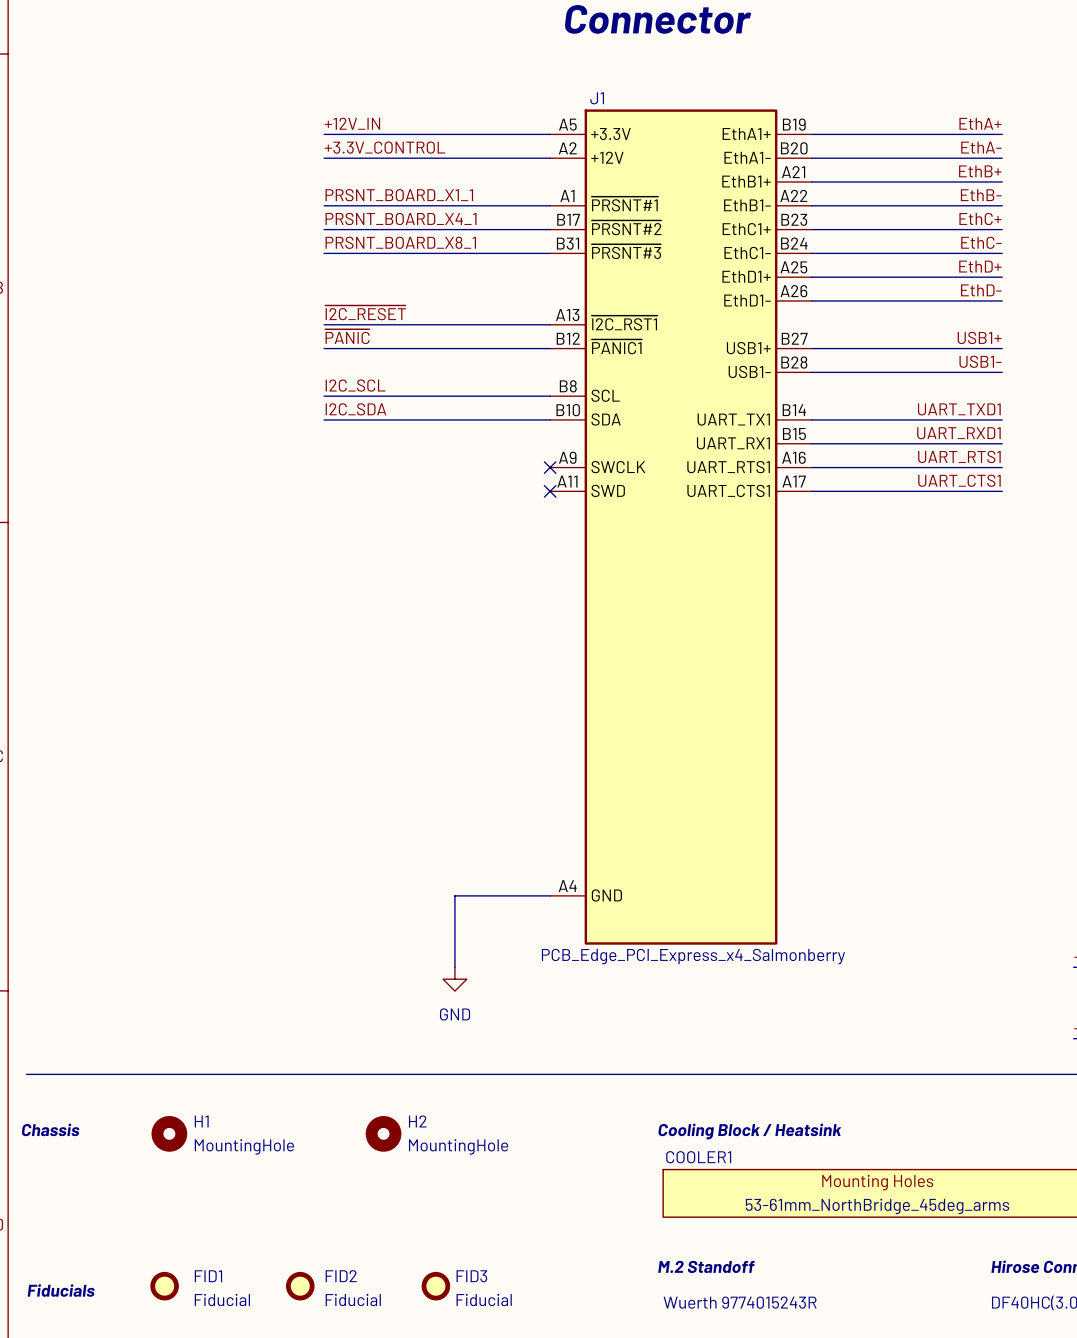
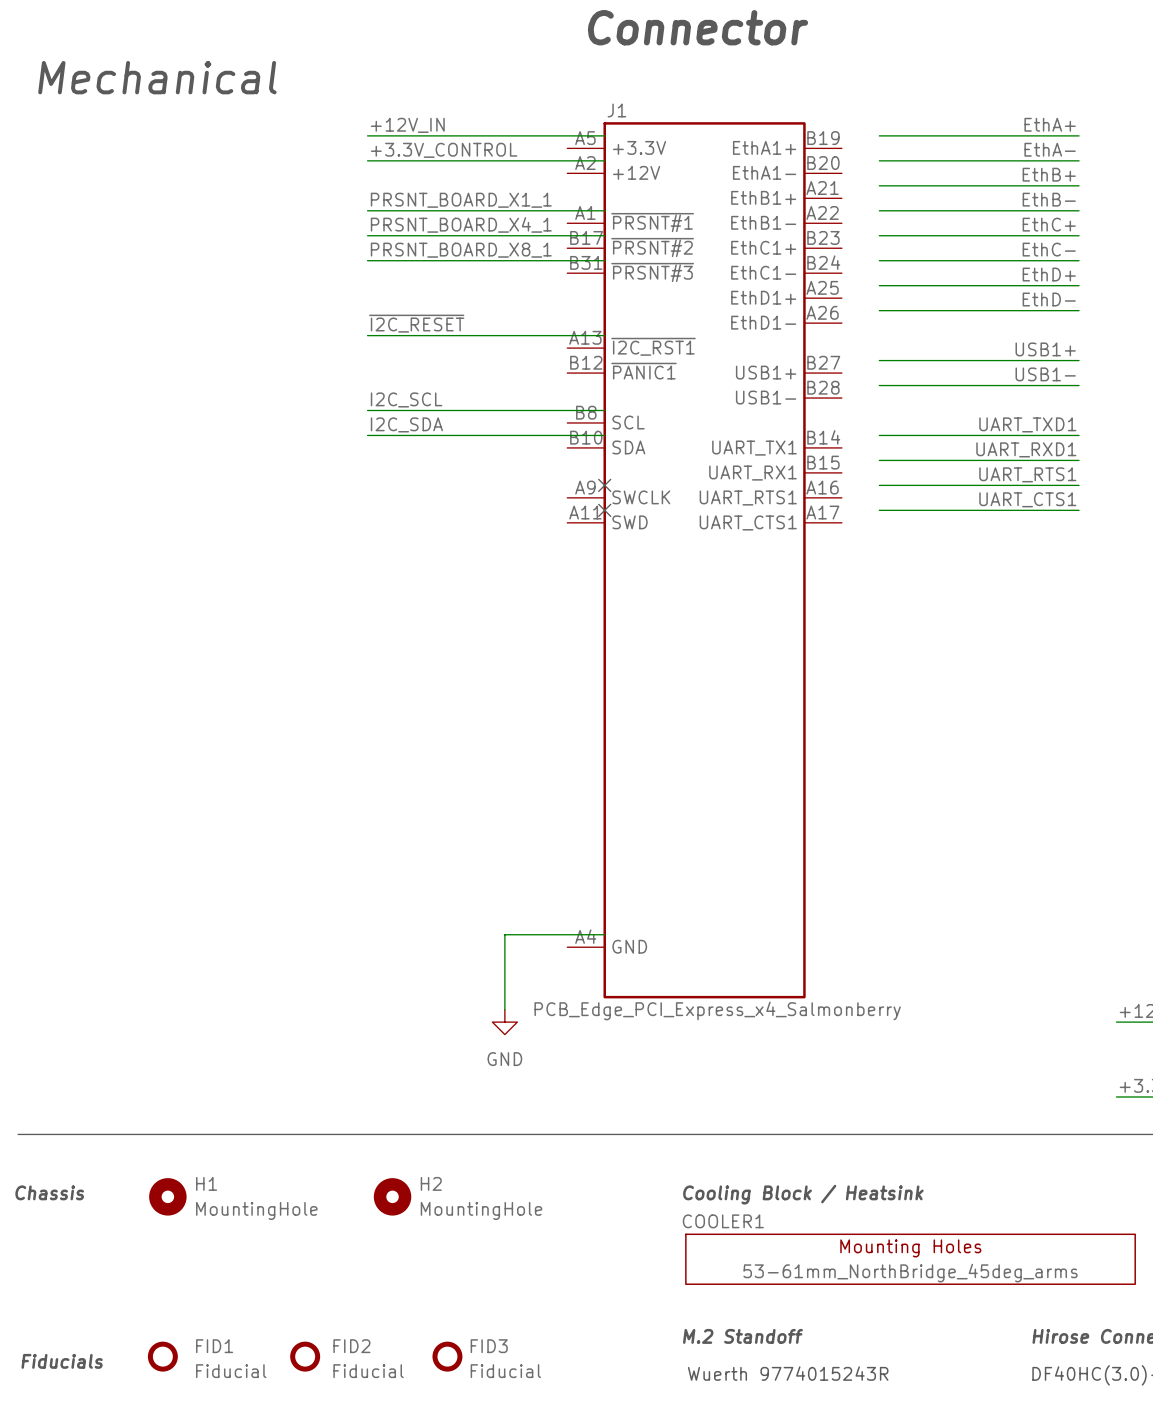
text: none -> Mechanical (157, 77)
label position: +12V_IN (352, 123) -> +12V_IN (407, 125)
label position: EthA+ (980, 123) -> EthA+ (1050, 124)
wire: (324, 134) (550, 134) -> (367, 135) (604, 135)
wire: (811, 134) (1002, 134) -> (879, 135) (1079, 135)
label position: +3.3V_CONTROL (384, 147) -> +3.3V_CONTROL (444, 150)
label position: EthA- (981, 147) -> EthA- (1050, 149)
wire: (324, 158) (550, 158) -> (367, 160) (604, 160)
wire: (811, 158) (1002, 158) -> (879, 160) (1079, 160)
label position: EthB+ (980, 171) -> EthB+ (1049, 174)
wire: (811, 182) (1002, 182) -> (879, 185) (1079, 185)
label position: PRSNT_BOARD_X1_1 (399, 195) -> PRSNT_BOARD_X1_1 (461, 200)
label position: EthB- (981, 195) -> EthB- (1049, 199)
wire: (324, 205) (550, 205) -> (367, 210) (604, 210)
wire: (811, 205) (1002, 205) -> (879, 210) (1079, 210)
label position: PRSNT_BOARD_X4_1 (401, 218) -> PRSNT_BOARD_X4_1 (461, 224)
label position: EthC+ (980, 218) -> EthC+ (1049, 224)
wire: (324, 229) (550, 229) -> (367, 235) (604, 235)
wire: (811, 229) (1002, 229) -> (879, 235) (1079, 235)
label position: PRSNT_BOARD_X8_1 (400, 242) -> PRSNT_BOARD_X8_1 (461, 250)
label position: EthC- (981, 242) -> EthC- (1049, 249)
wire: (324, 253) (550, 253) -> (367, 260) (604, 260)
wire: (811, 253) (1002, 253) -> (879, 260) (1079, 260)
label position: EthD+ (980, 266) -> EthD+ (1049, 274)
wire: (811, 277) (1002, 277) -> (879, 285) (1079, 285)
label position: EthD- (981, 290) -> EthD- (1049, 299)
wire: (811, 300) (1002, 300) -> (879, 310) (1079, 310)
label position: ~{I2C_RESET} (365, 312) -> ~{I2C_RESET} (416, 323)
wire: (324, 324) (550, 324) -> (367, 335) (604, 335)
label: ~{PANIC} (347, 336) -> none
label position: USB1+ (979, 337) -> USB1+ (1045, 349)
wire: (324, 348) (550, 348) -> none
wire: (811, 348) (1002, 348) -> (879, 360) (1079, 360)
label position: USB1- (980, 361) -> USB1- (1045, 374)
wire: (811, 372) (1002, 372) -> (879, 385) (1079, 385)
label position: I2C_SCL (355, 385) -> I2C_SCL (406, 399)
wire: (324, 396) (550, 396) -> (367, 410) (604, 410)
label position: I2C_SDA (355, 409) -> I2C_SDA (406, 424)
label position: UART_TXD1 (959, 409) -> UART_TXD1 (1027, 424)
wire: (324, 419) (550, 419) -> (367, 435) (604, 435)
wire: (811, 419) (1002, 419) -> (879, 435) (1079, 435)
label position: UART_RXD1 (958, 433) -> UART_RXD1 (1026, 449)
wire: (811, 443) (1002, 443) -> (879, 460) (1079, 460)
no-connect mark: none -> (604, 485)
label position: UART_RTS1 (959, 456) -> UART_RTS1 (1027, 474)
no-connect mark: (550, 467) -> none
wire: (811, 467) (1002, 467) -> (879, 485) (1079, 485)
no-connect mark: none -> (604, 510)
label position: UART_CTS1 (959, 480) -> UART_CTS1 (1027, 499)
no-connect mark: (550, 491) -> none
wire: (811, 491) (1002, 491) -> (879, 510) (1079, 510)
wire: (550, 895) (454, 895) (454, 967) -> (604, 934) (504, 934) (504, 1009)
power symbol position: GND (454, 979) -> GND (504, 1022)

